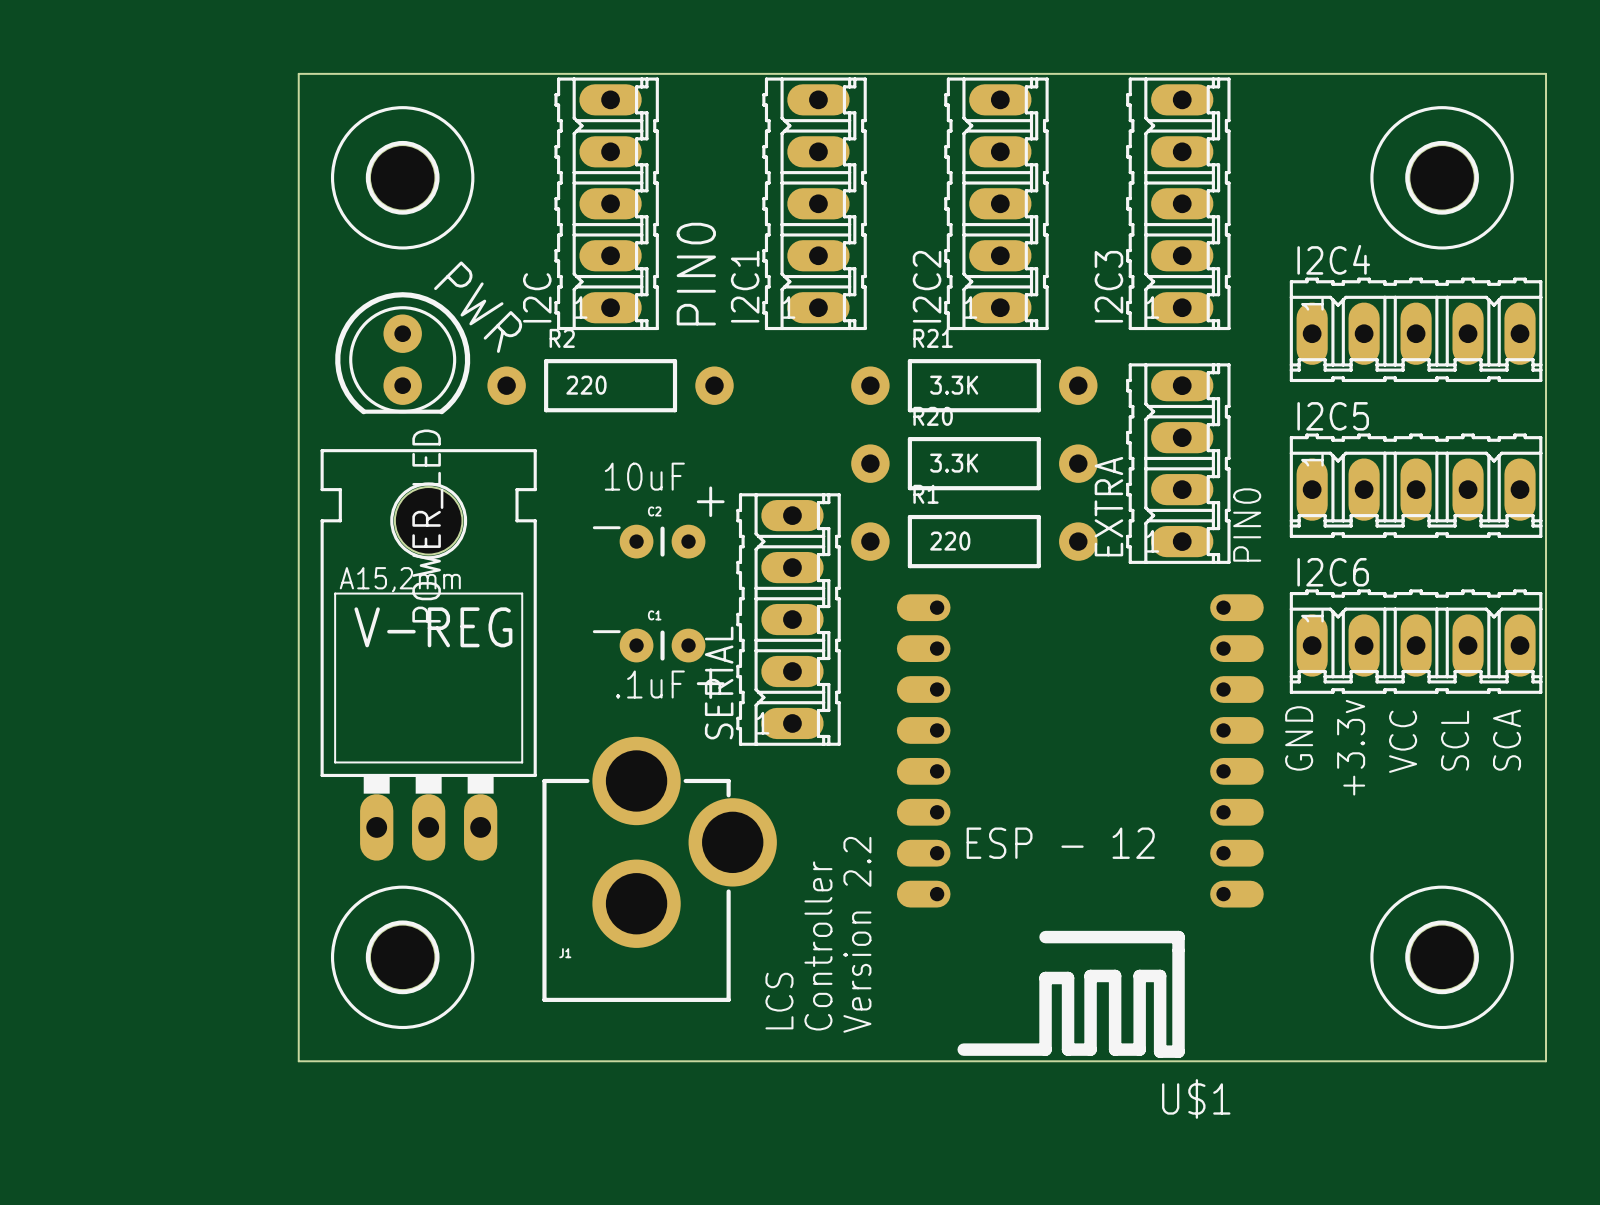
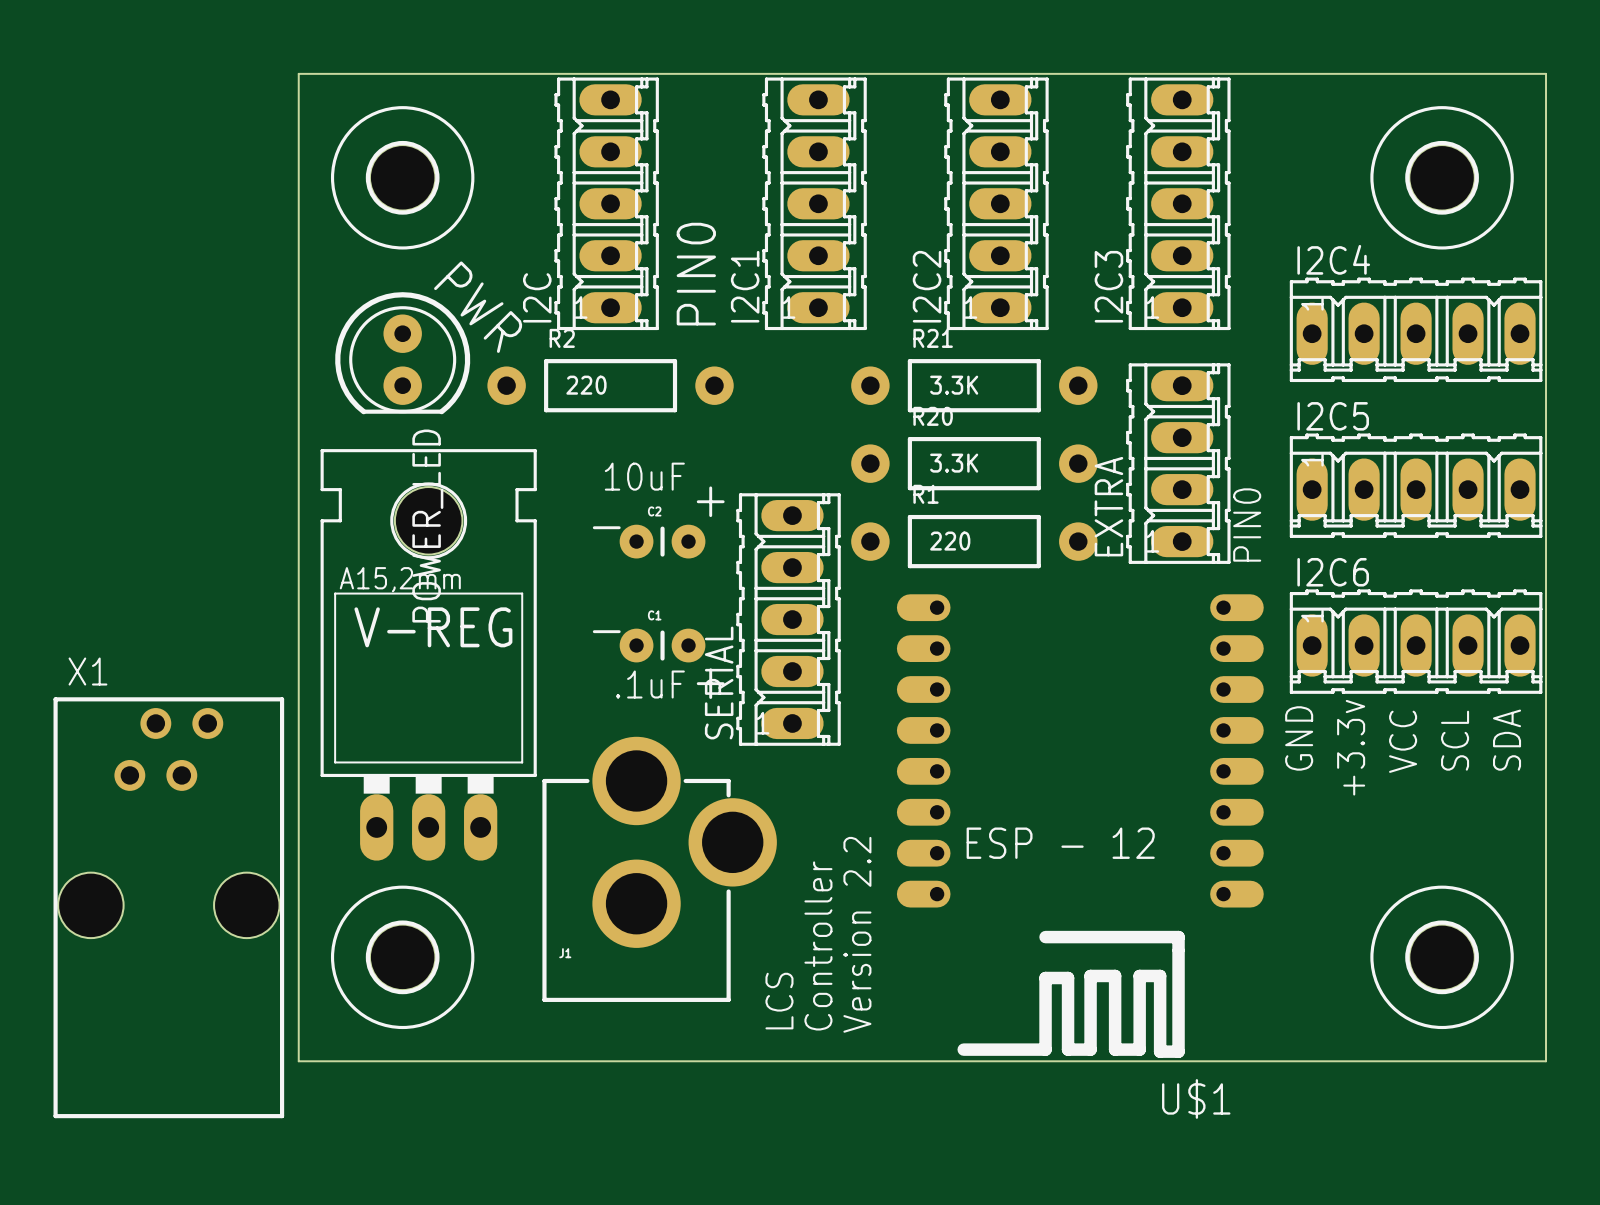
text: SCA (1507, 740) -> SDA (1507, 740)
X1: none -> (168, 907)

